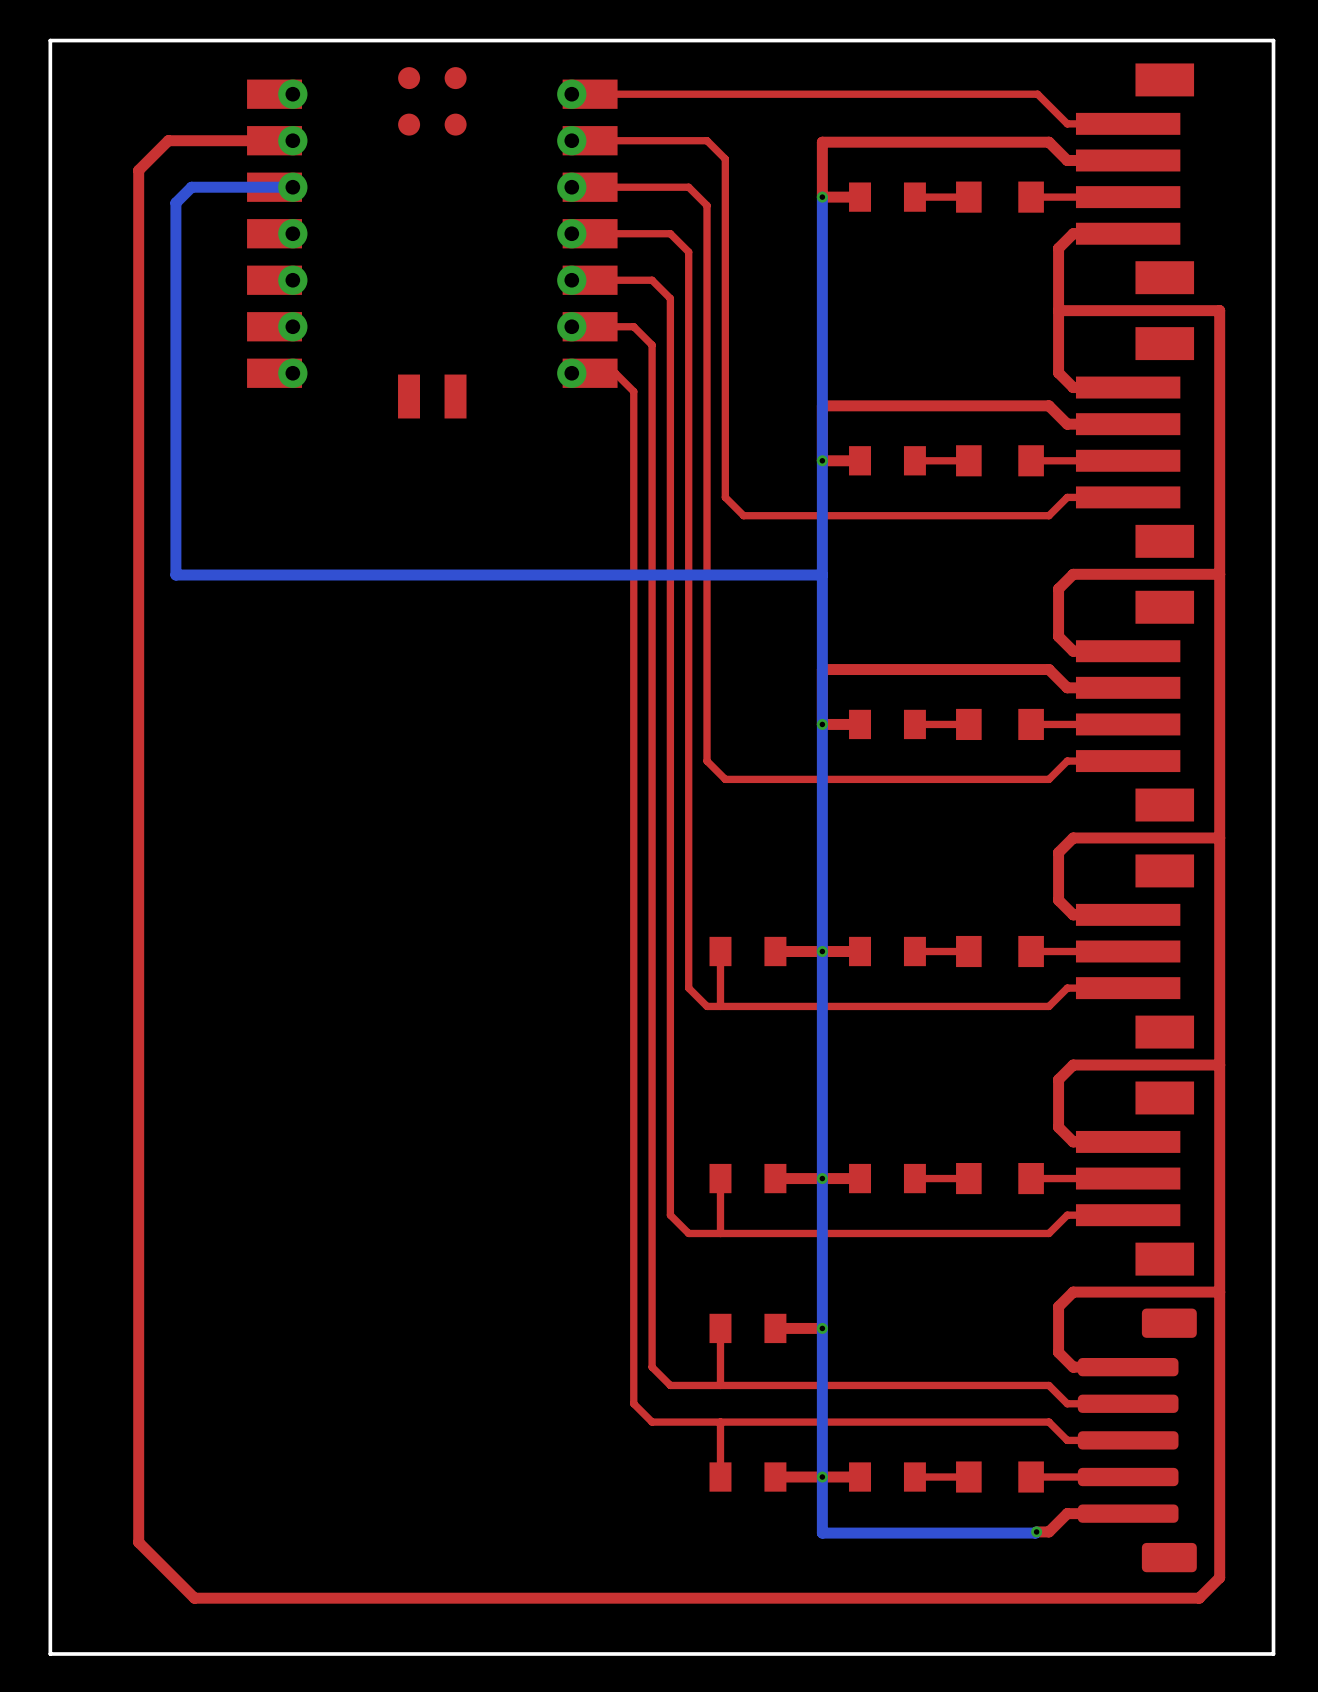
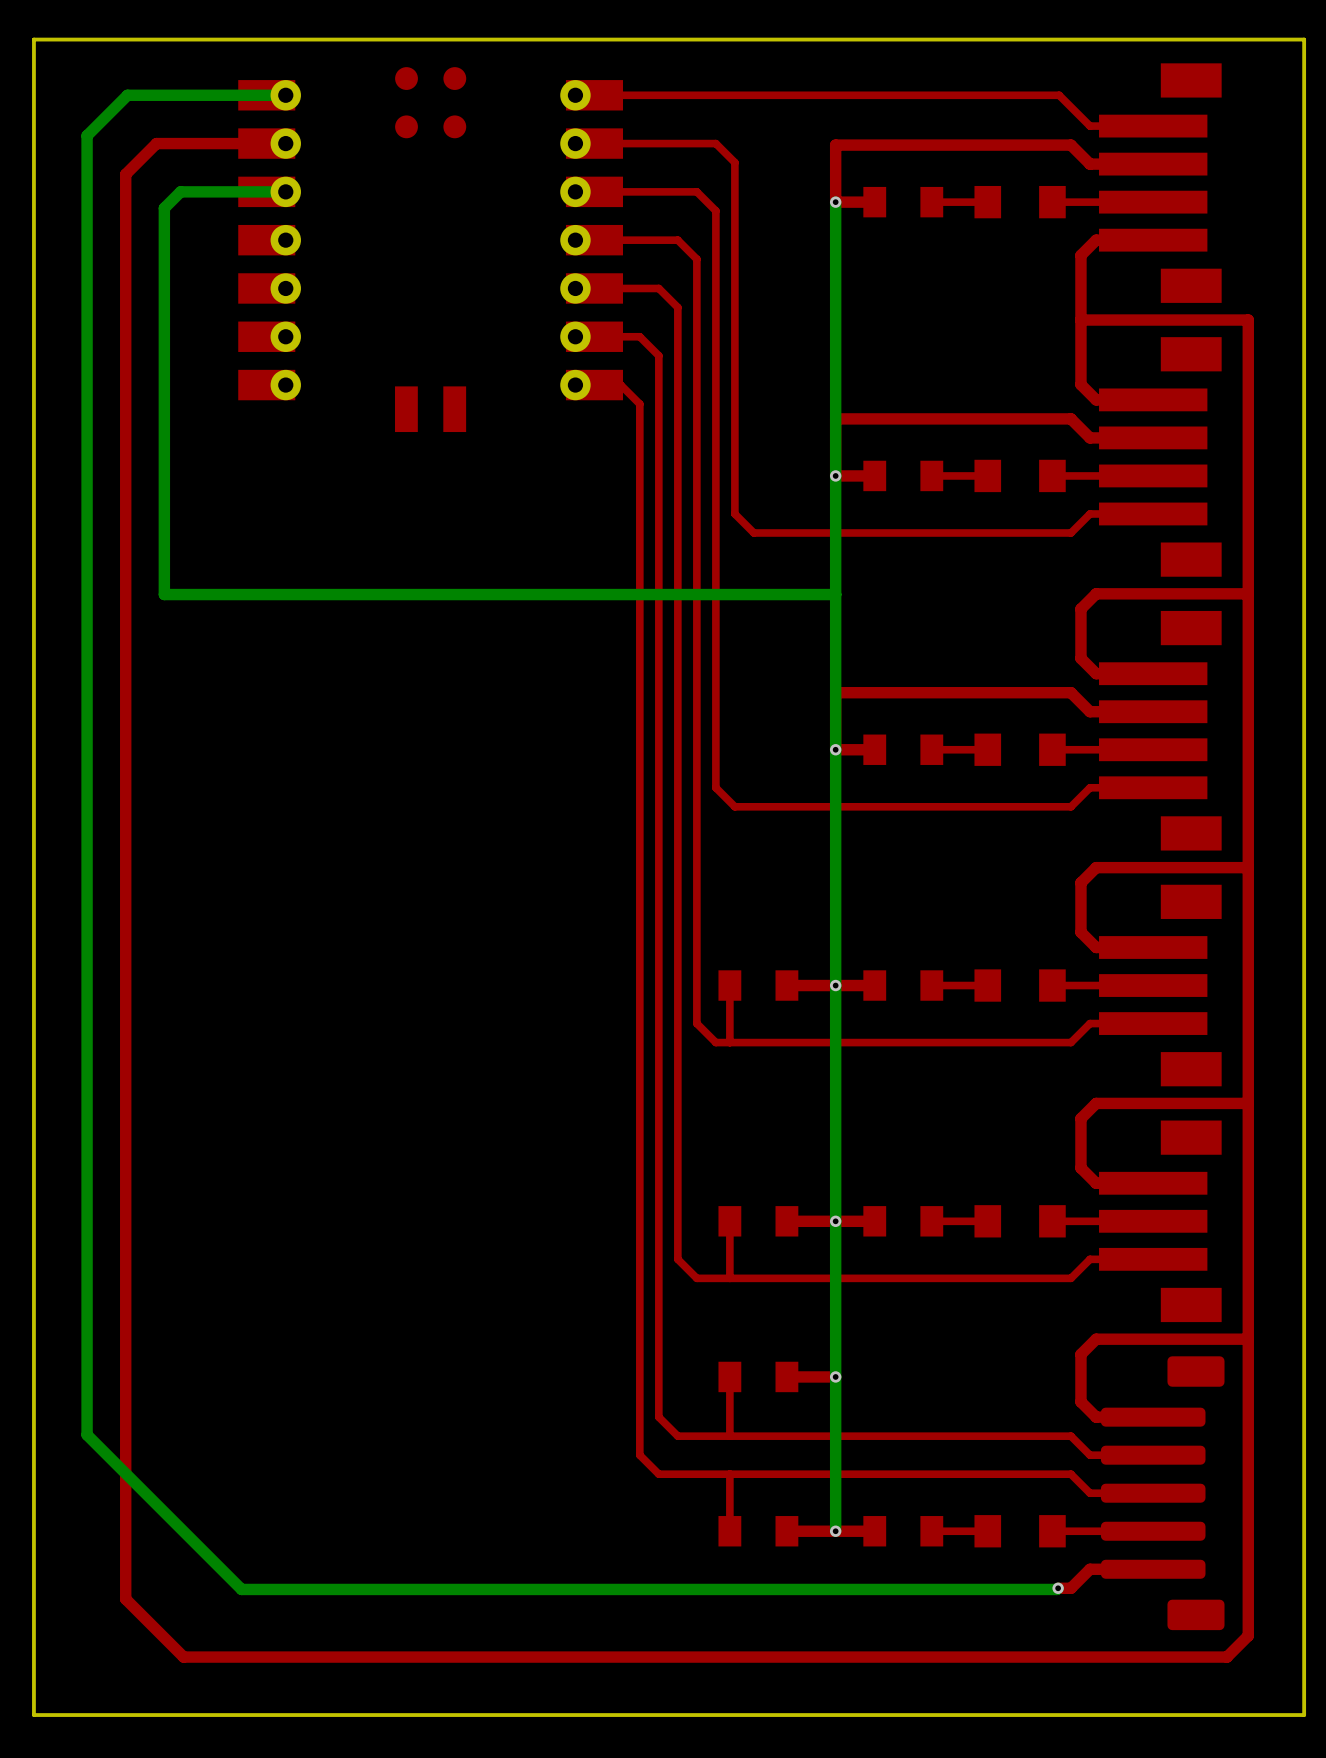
bottom track: (822, 1477) (822, 1533) -> (285, 95) (127, 95) (87, 135) (87, 1434) (241, 1589) (835, 1589)

